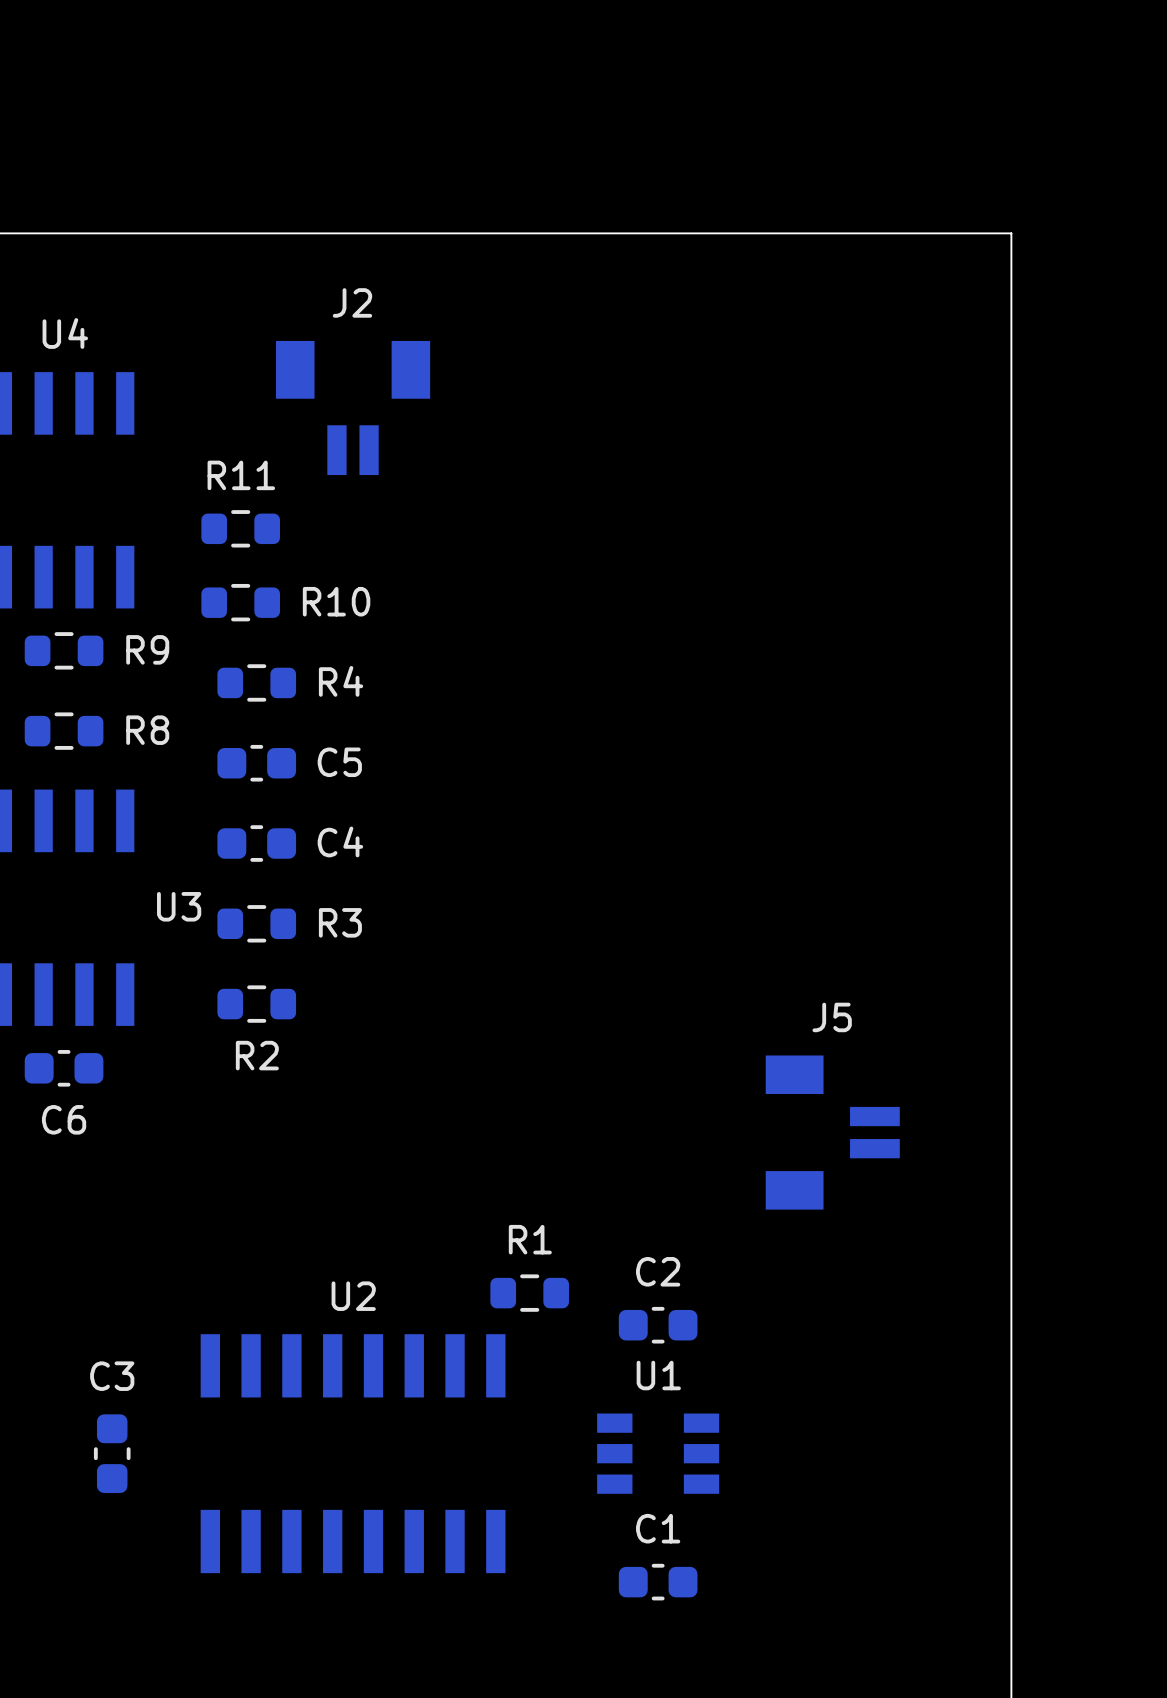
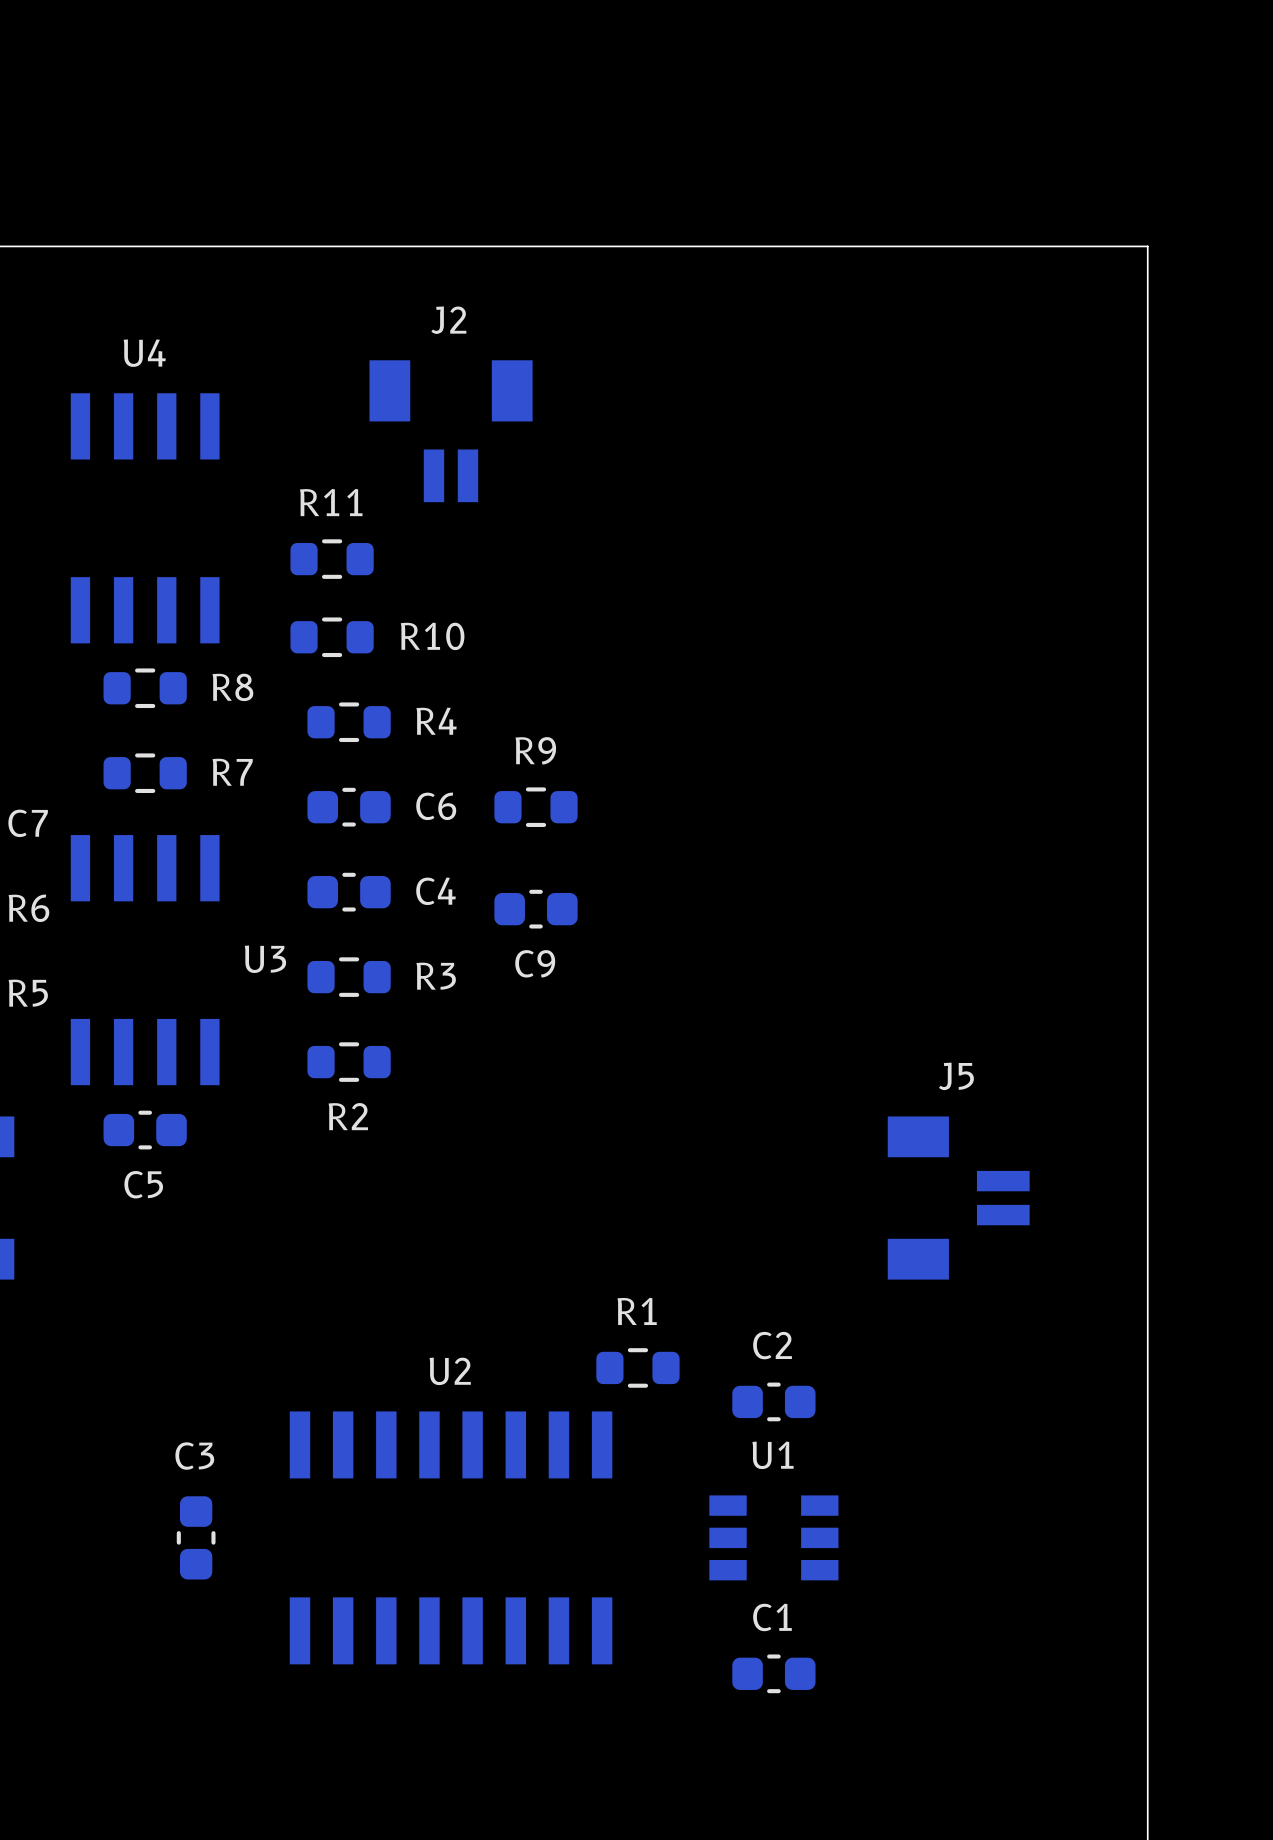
R9 name: R9 (147, 649) -> R8 (232, 687)
R8 name: R8 (147, 730) -> R7 (232, 772)
C5 name: C5 (339, 762) -> C6 (436, 806)
R9: none -> (536, 807)
C9: none -> (536, 909)
C6 name: C6 (64, 1119) -> C5 (143, 1184)

